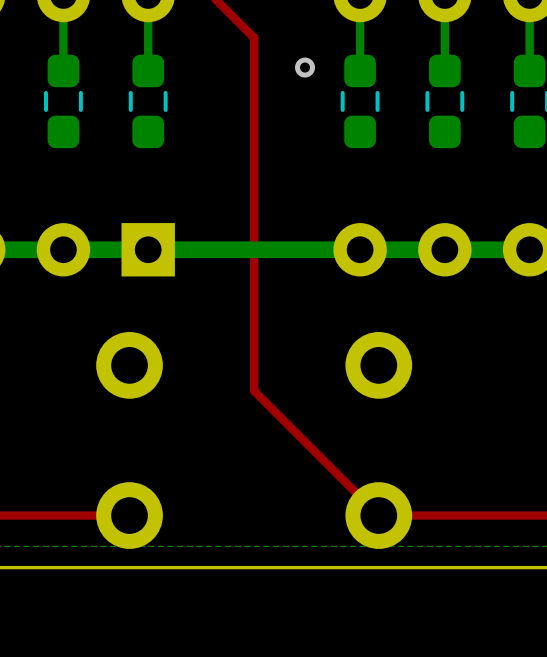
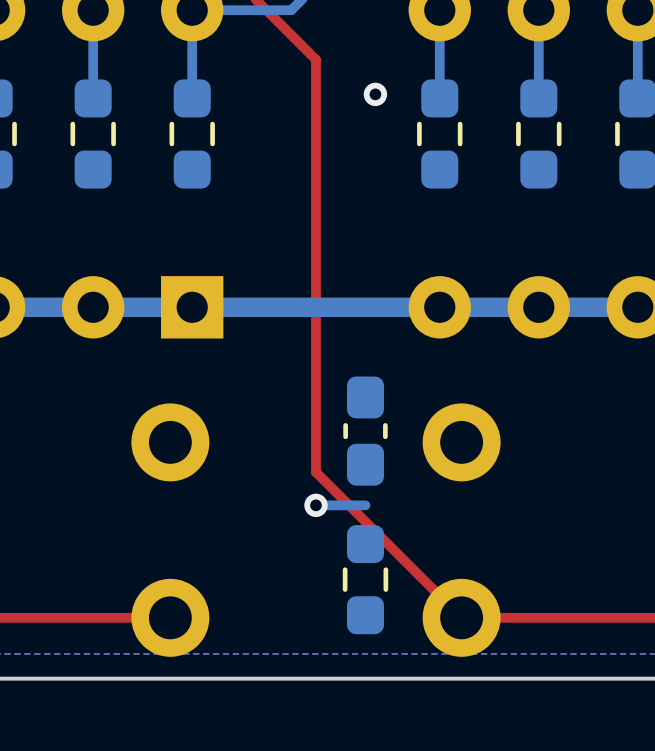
part: none -> (365, 431)
via: none -> (315, 505)
bottom track: none -> (365, 505) (315, 505)
part: none -> (365, 579)

